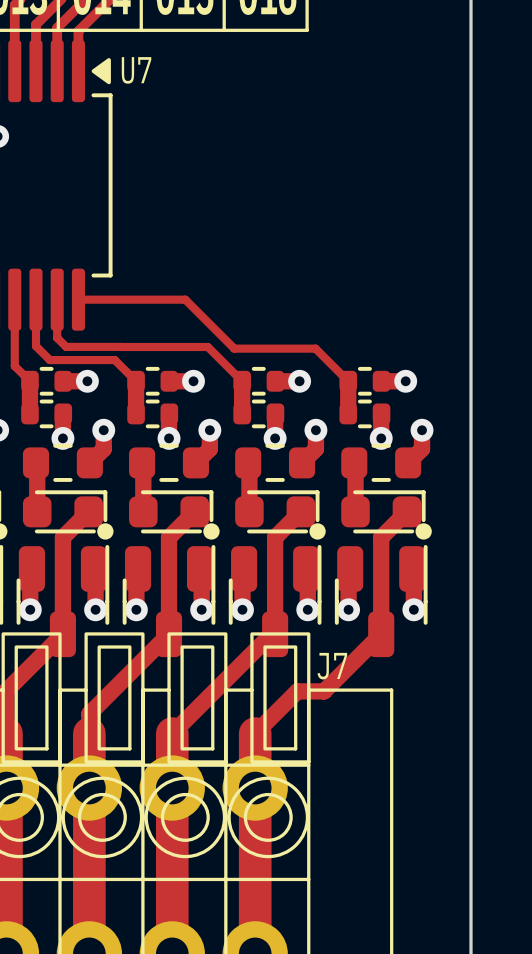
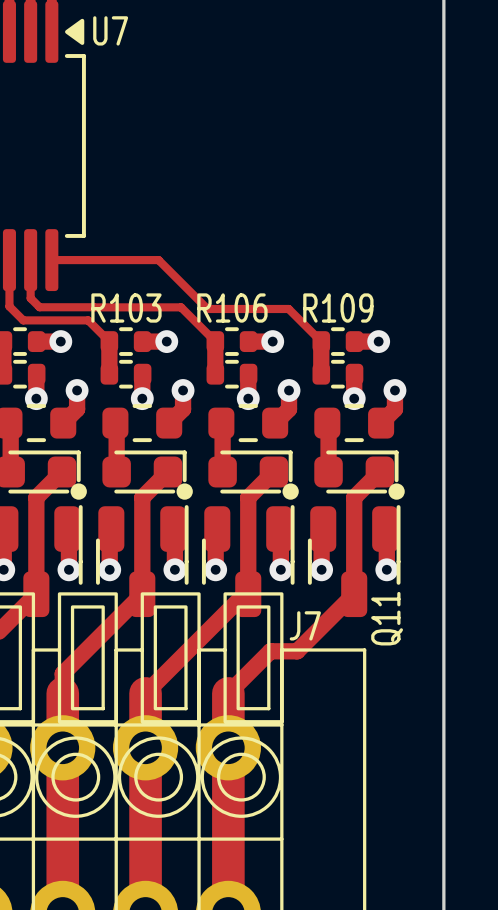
R103 name: none -> R103 (126, 308)
R106 name: none -> R106 (232, 308)
R109 name: none -> R109 (338, 308)
Q11 name: none -> Q11 (387, 618)

